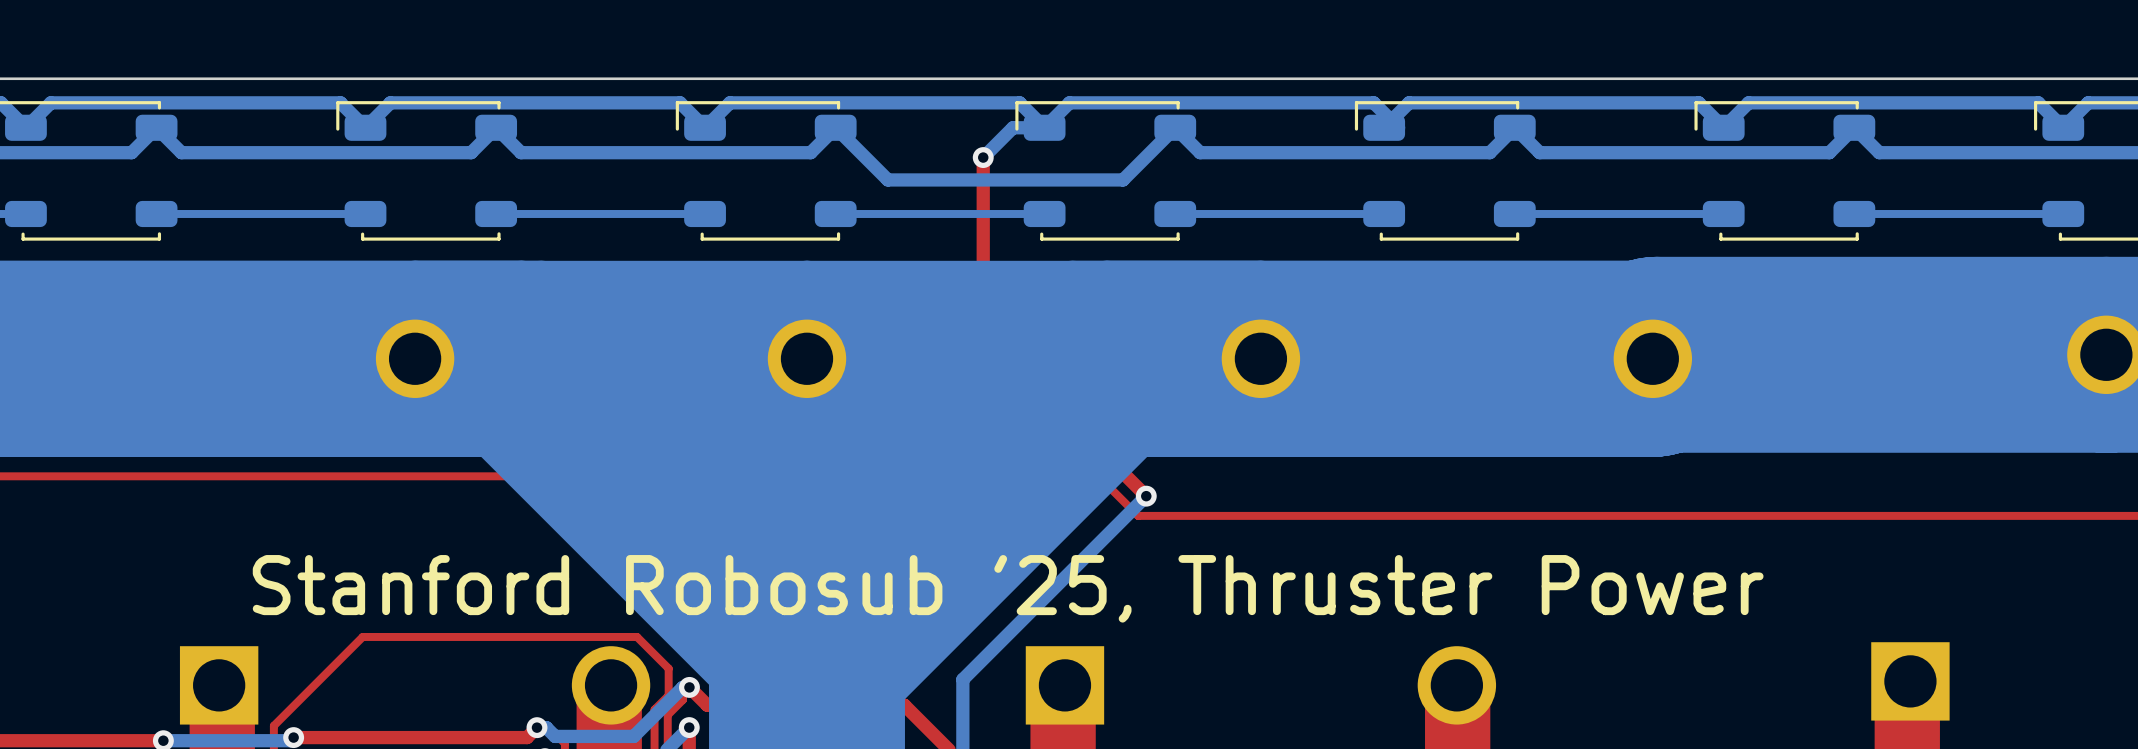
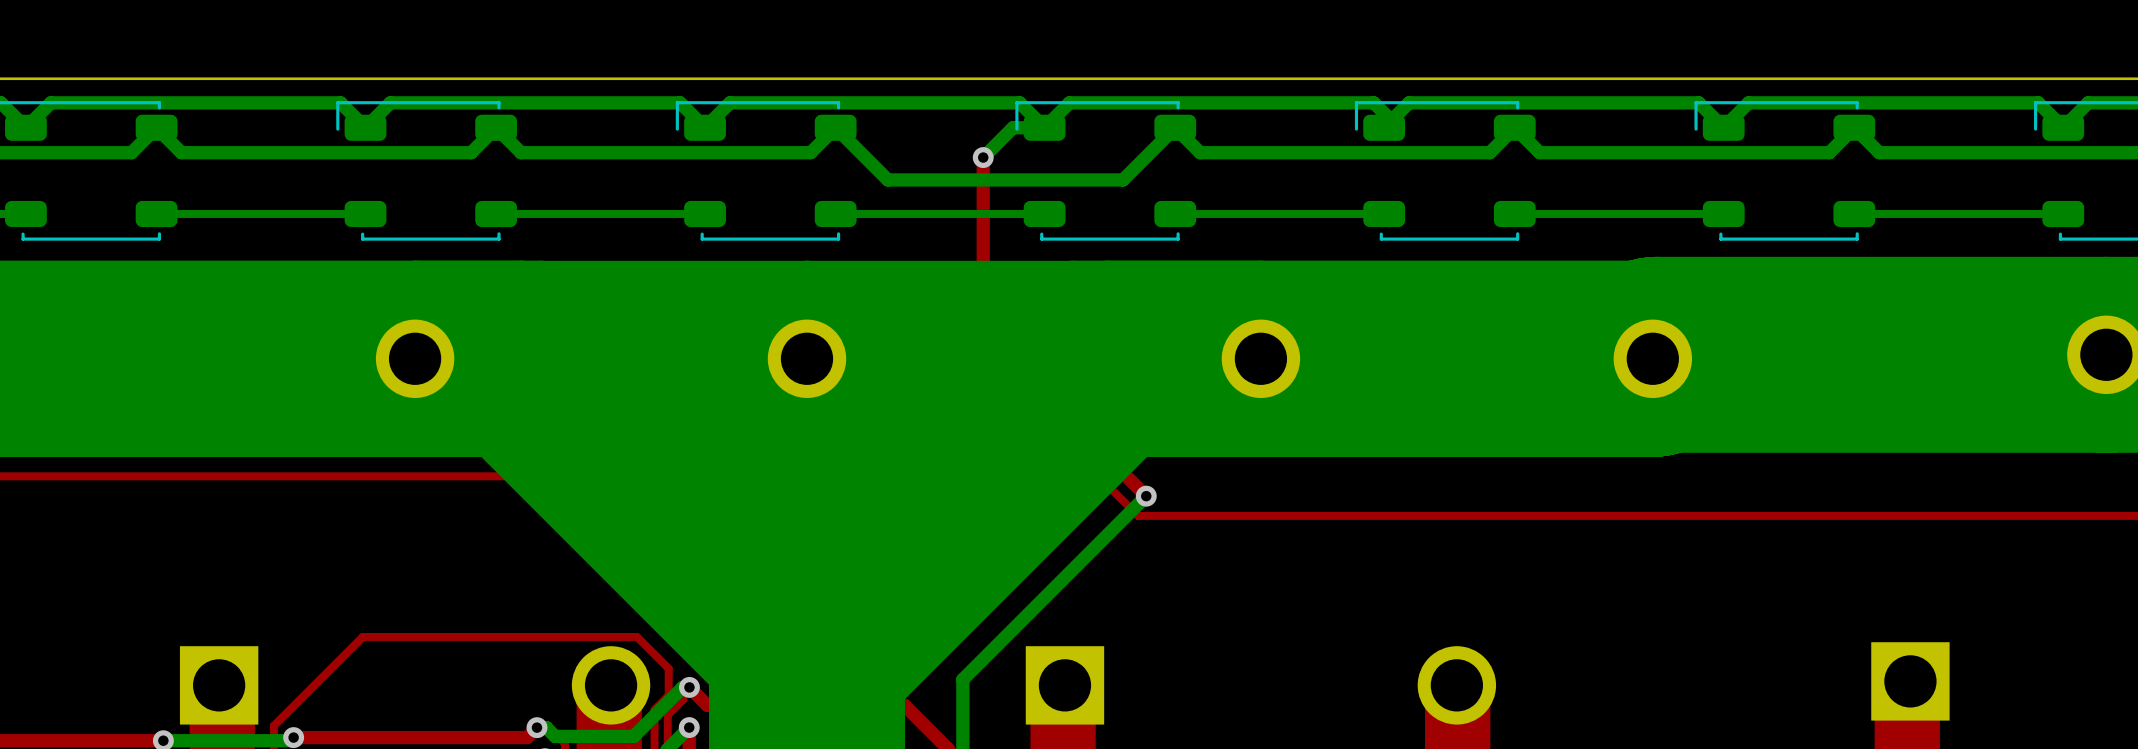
text: Stanford Robosub '25, Thruster Power (1008, 588) -> none

